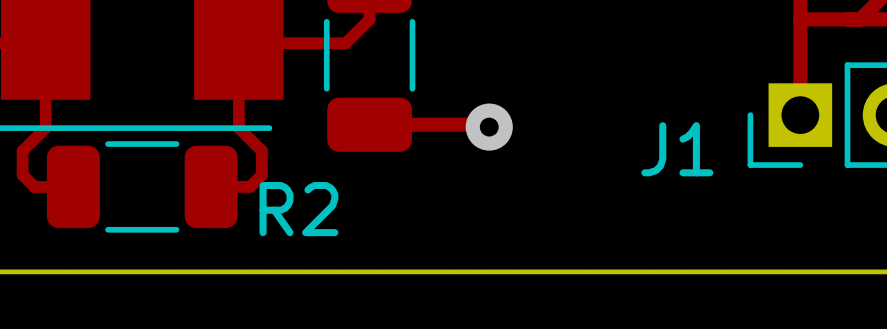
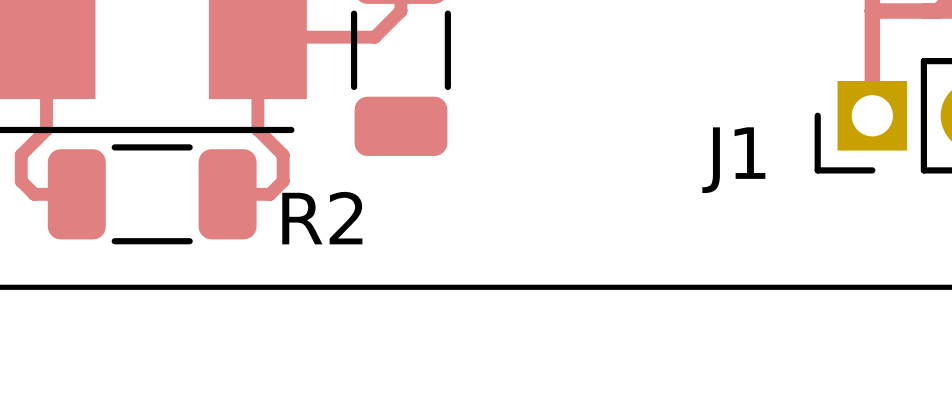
top track: (369, 124) (486, 124) (489, 127) -> none
via: (489, 127) -> none

